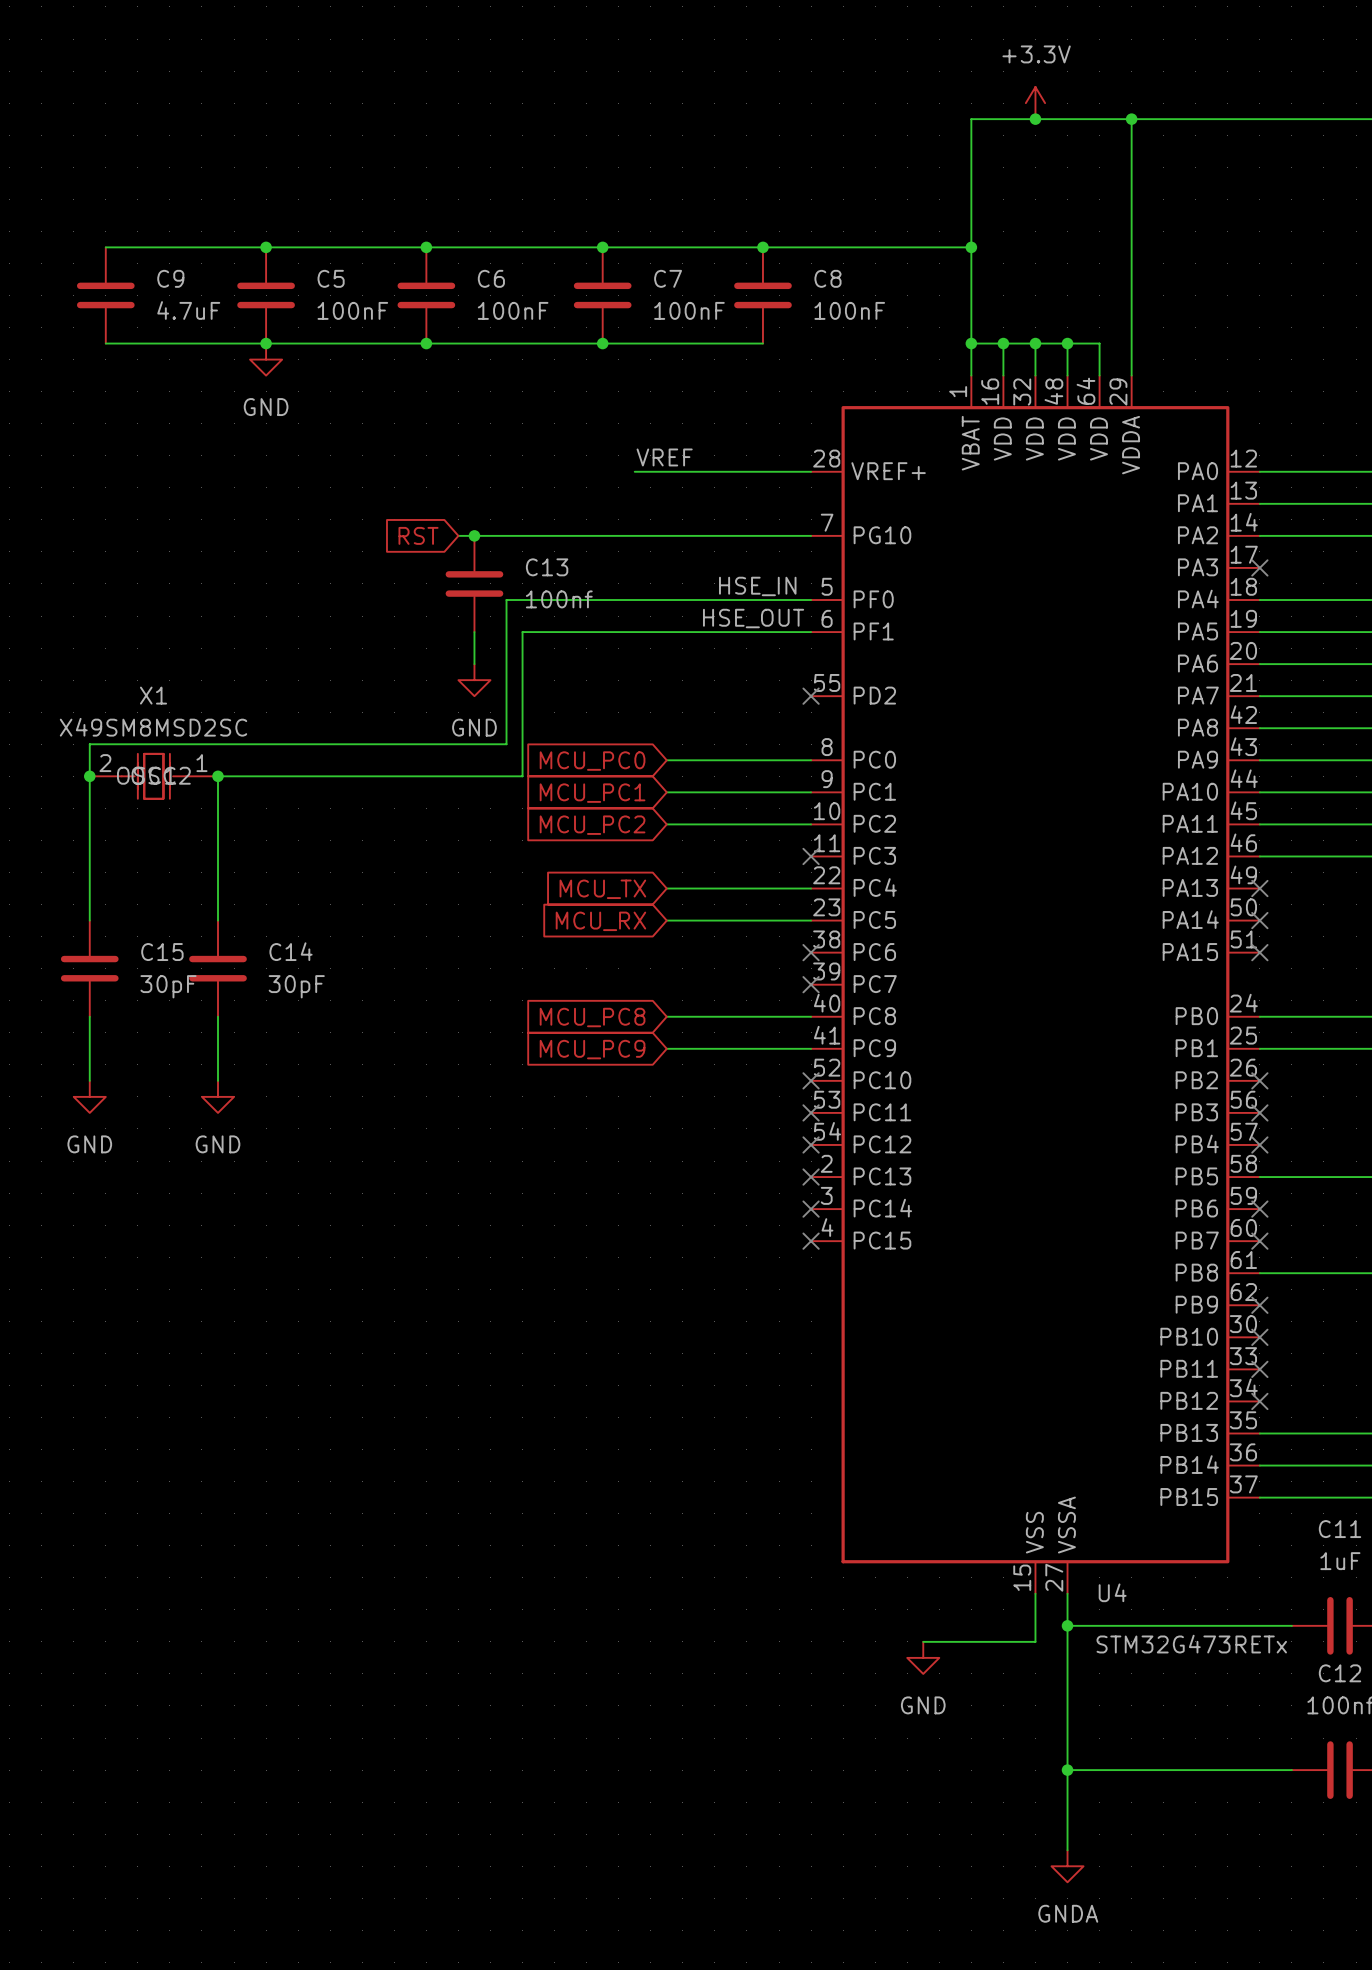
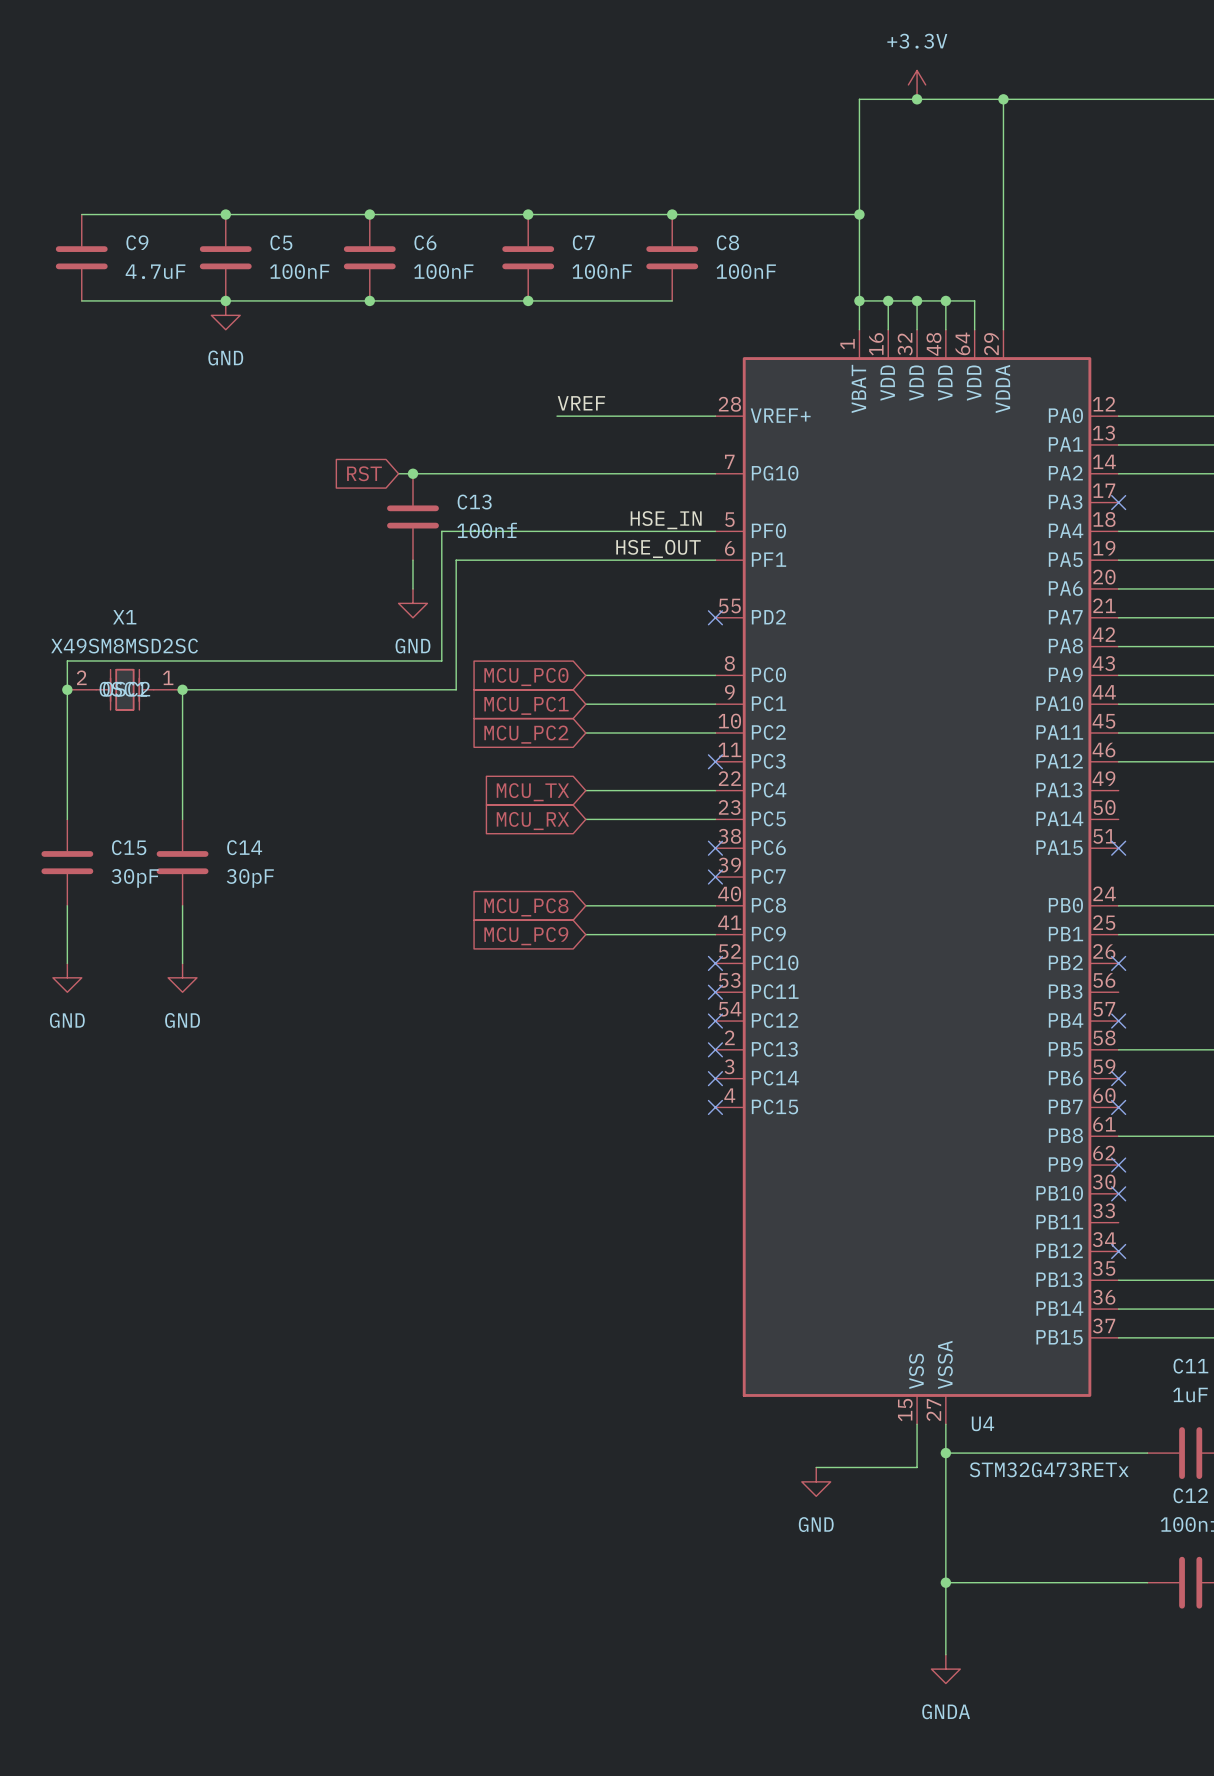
no-connect mark: (1259, 888) -> none
no-connect mark: (1259, 920) -> none
no-connect mark: (1259, 1112) -> none
no-connect mark: (1259, 1369) -> none

